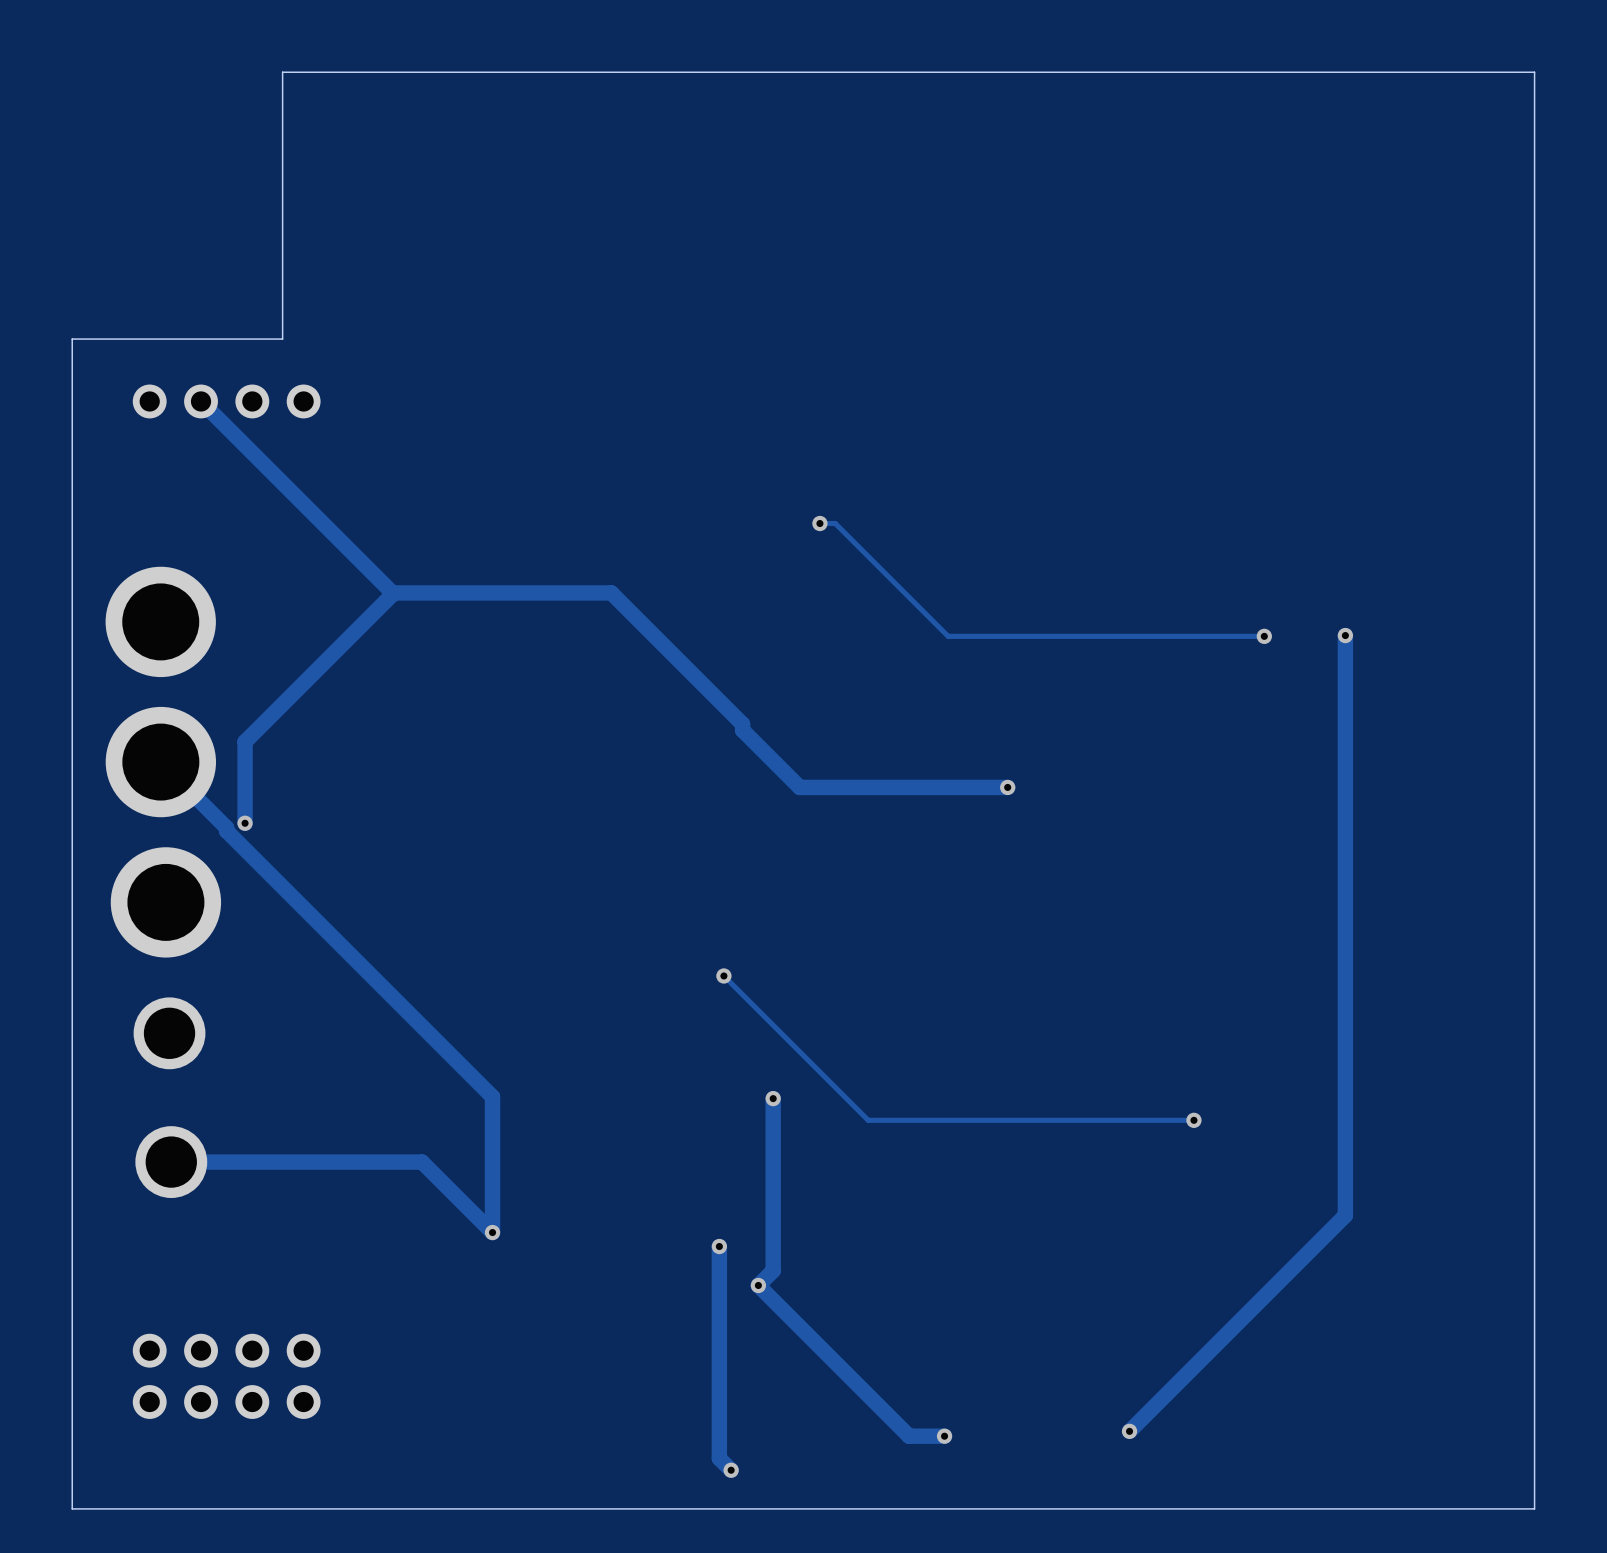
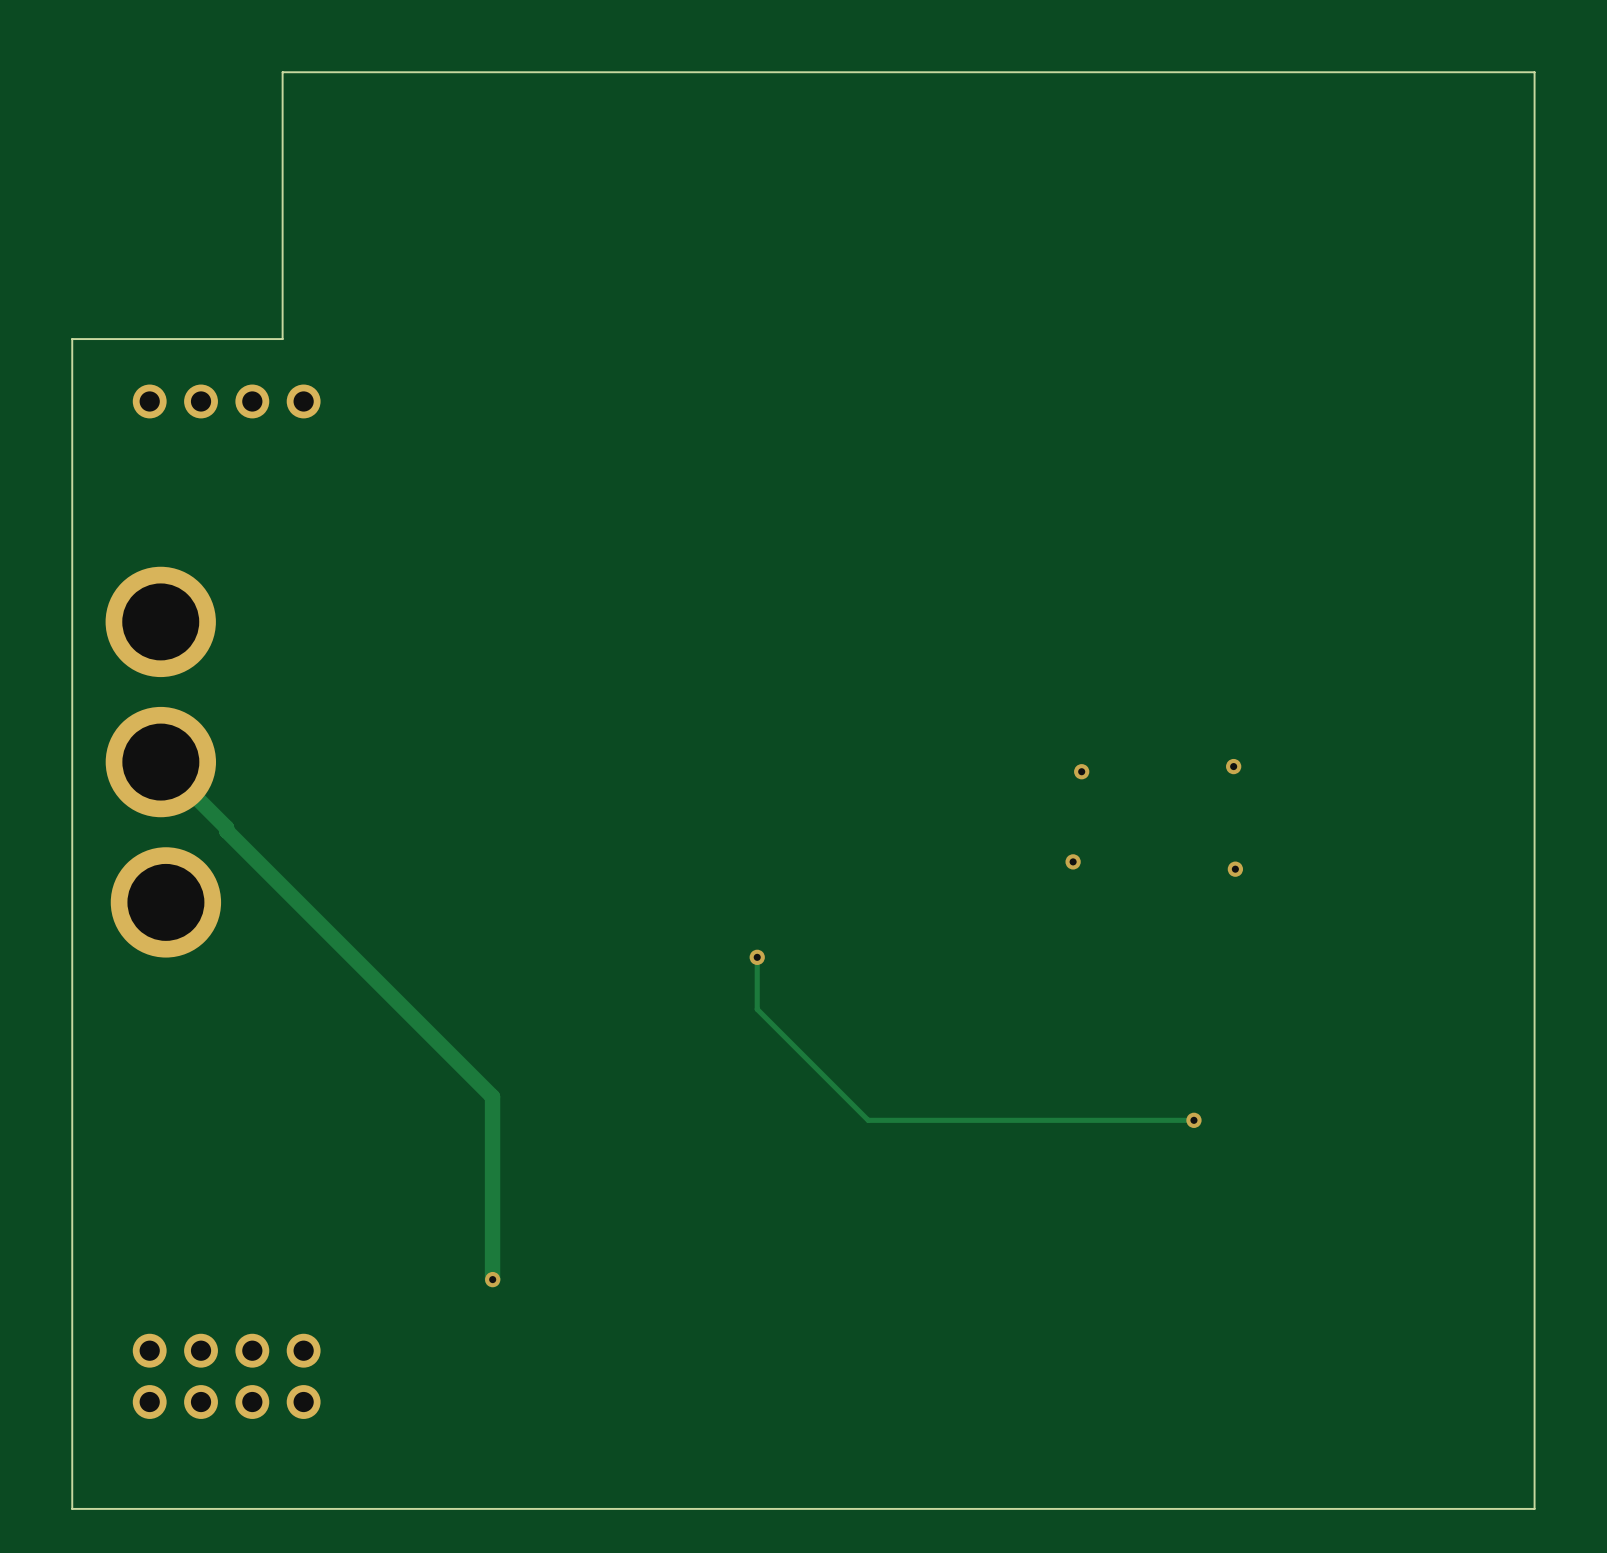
track: (201, 401) (392, 592) -> none
track: (819, 523) (835, 523) (948, 636) (1264, 636) -> none
via: (819, 523) -> none
track: (392, 592) (611, 592) (742, 724) (742, 730) (799, 787) (1007, 787) -> none
track: (392, 592) (245, 741) (245, 823) -> none
track: (1345, 635) (1345, 1215) (1129, 1431) -> none
via: (1345, 635) -> none
via: (1264, 636) -> none
via: none -> (1233, 766)
via: none -> (1081, 771)
via: (1007, 787) -> none
via: (245, 823) -> none
via: none -> (1073, 861)
via: none -> (1235, 869)
track: (723, 975) (757, 1009) -> (757, 957) (757, 1009)
via position: (723, 975) -> (757, 957)
part: (169, 1033) -> none
track: (773, 1098) (773, 1270) (758, 1285) (909, 1436) (944, 1436) -> none
via: (773, 1098) -> none
track: (171, 1162) (422, 1162) (492, 1232) -> (492, 1279) (492, 1232)
part: (171, 1162) -> none
via position: (492, 1232) -> (492, 1279)
track: (719, 1246) (719, 1458) (731, 1470) -> none
via: (719, 1246) -> none
via: (758, 1285) -> none
via: (1129, 1431) -> none
via: (944, 1436) -> none
via: (731, 1470) -> none

